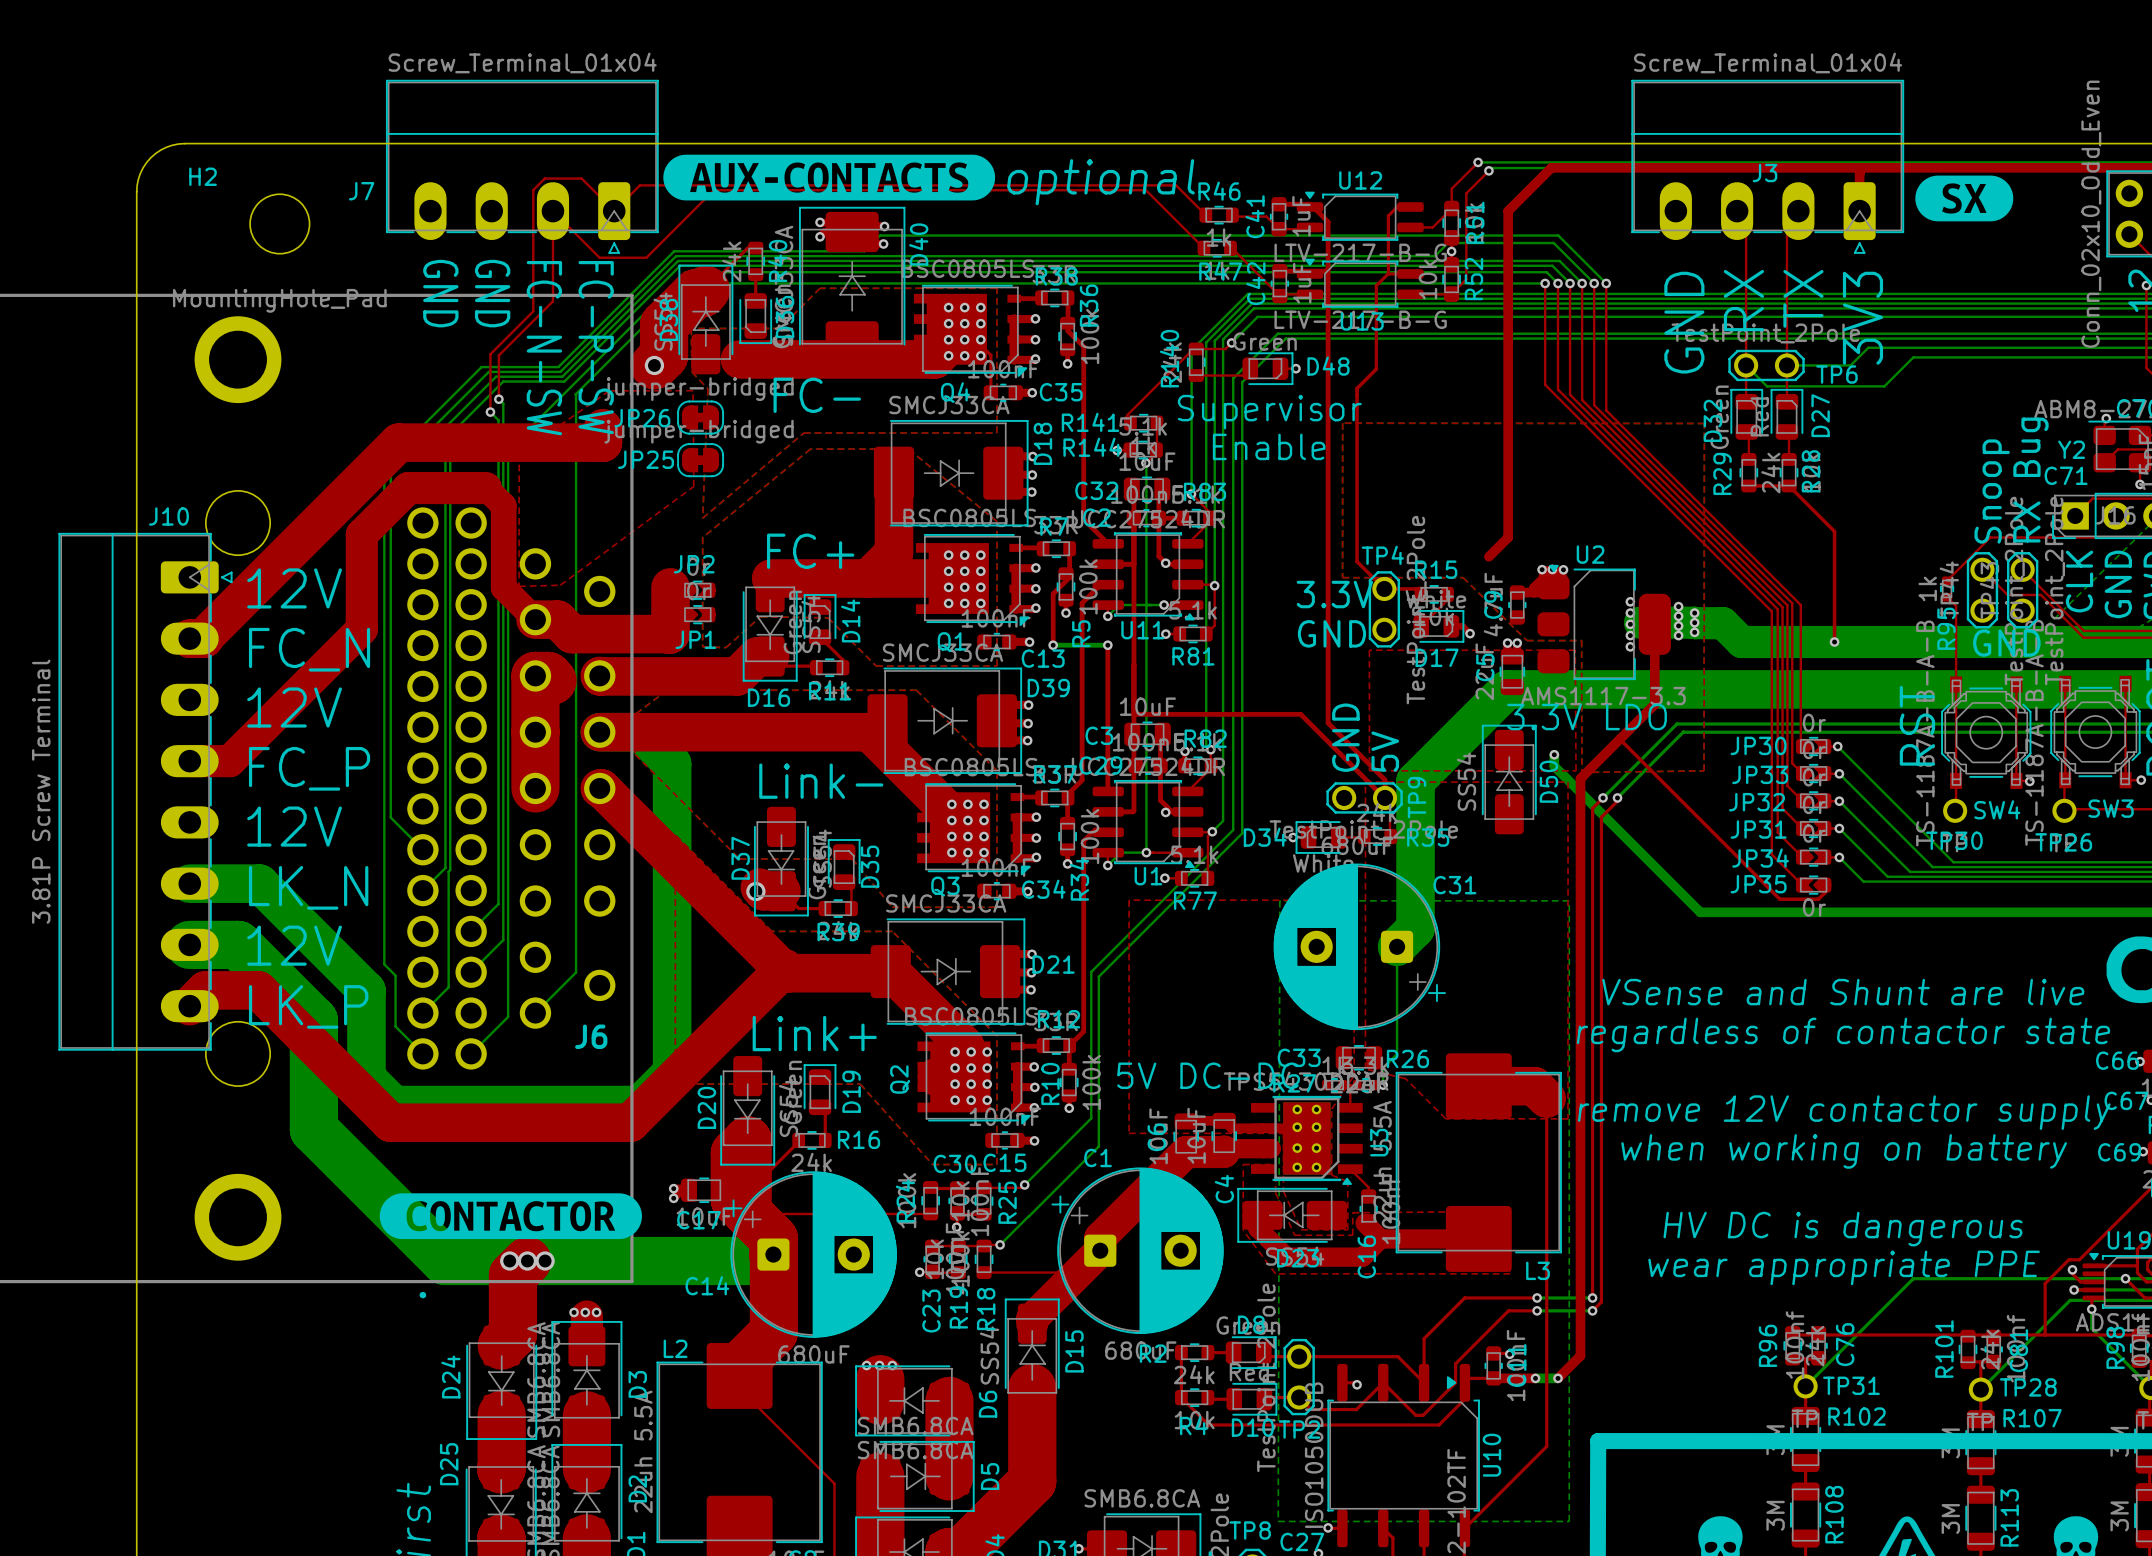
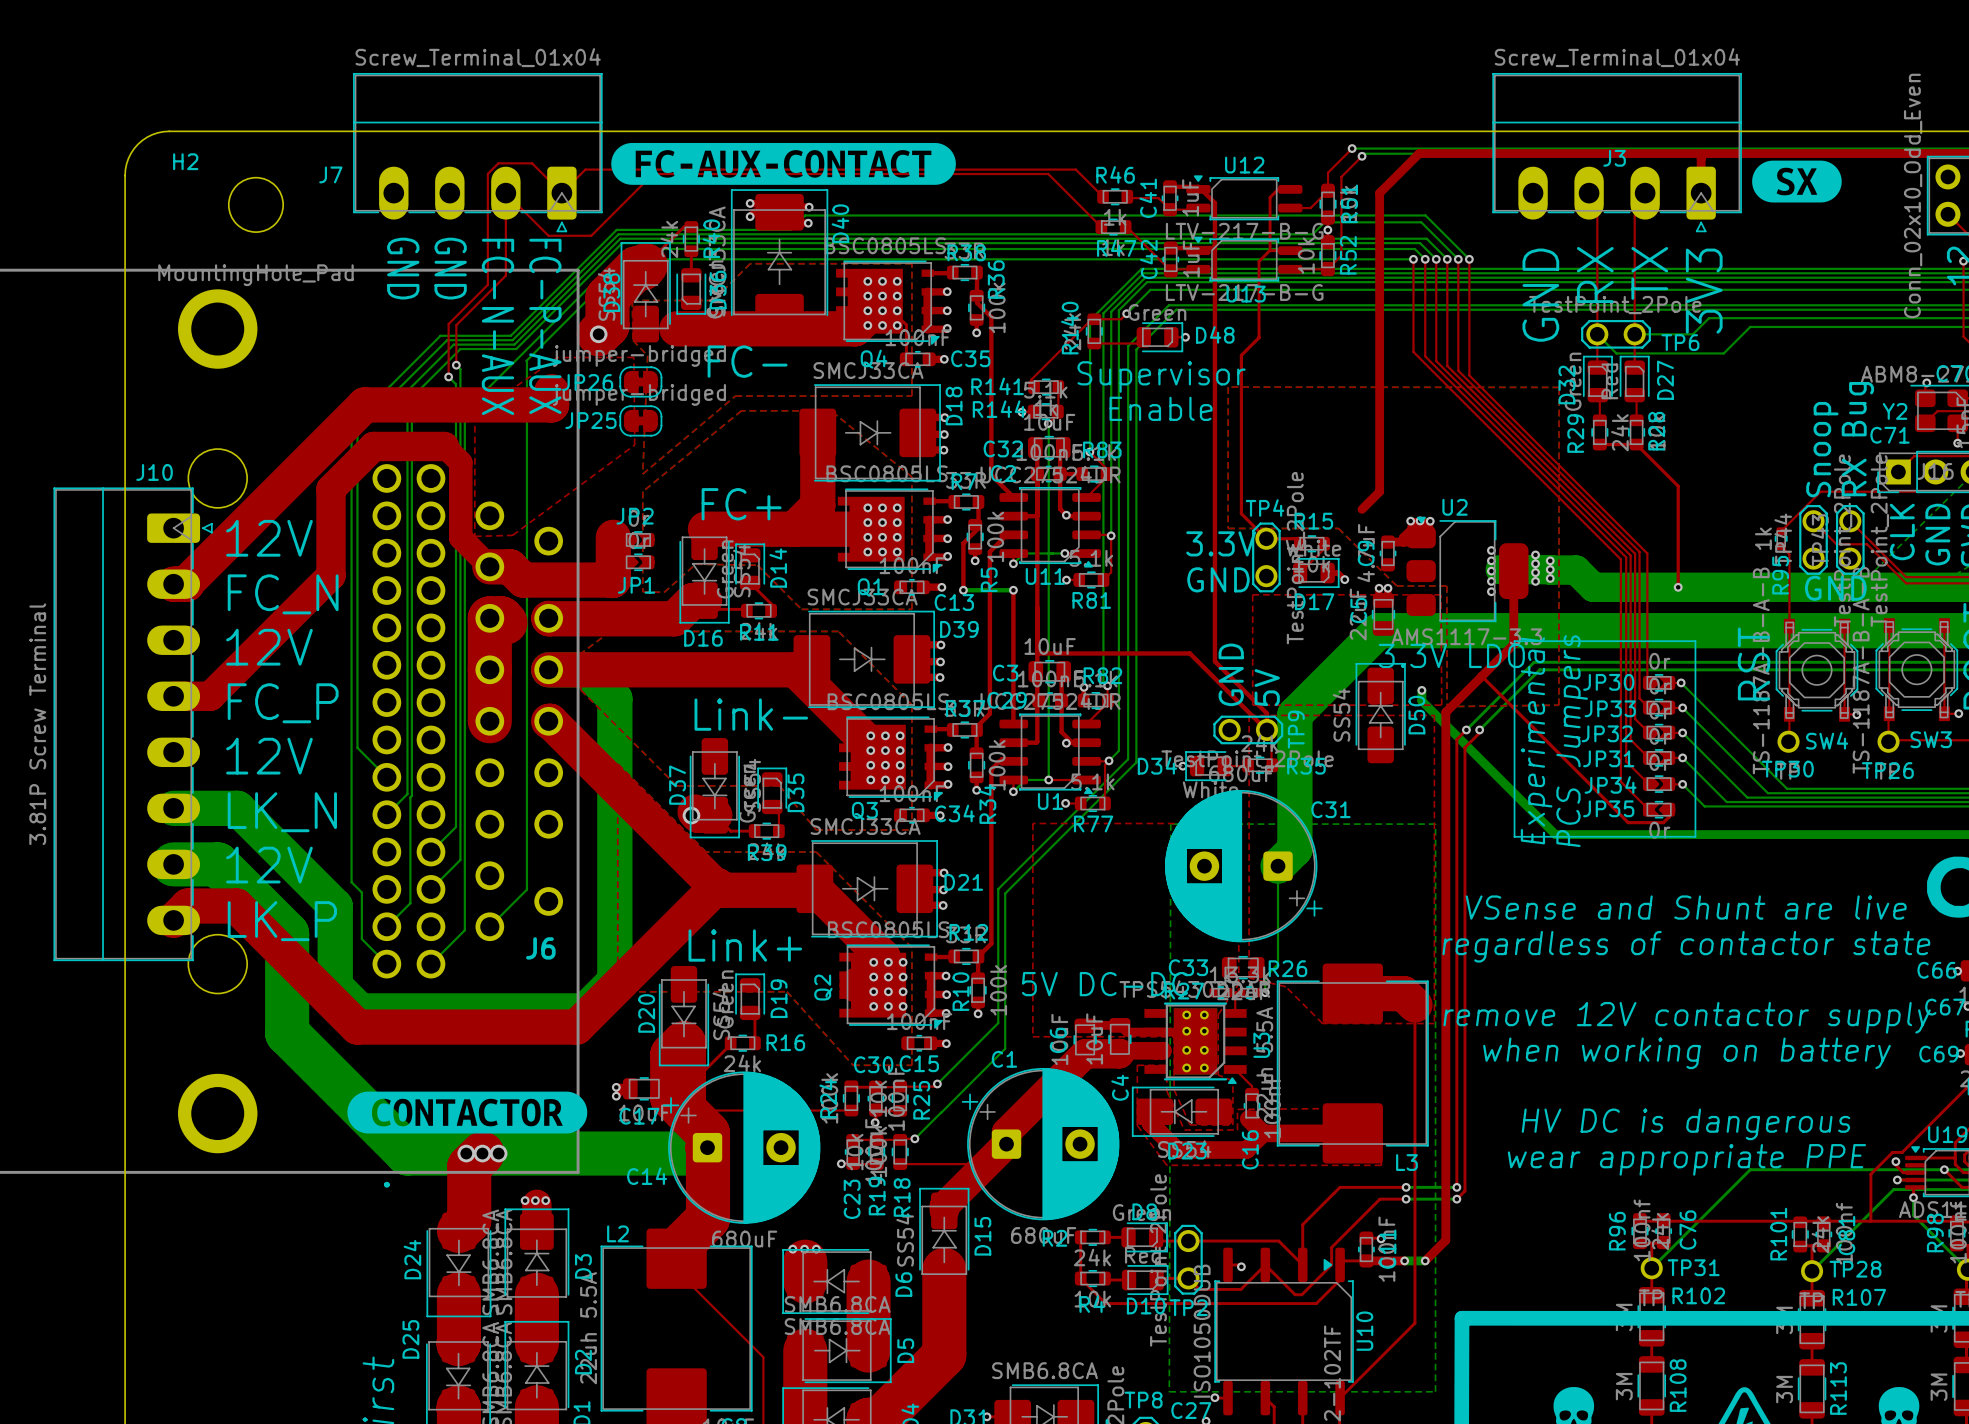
drawing: [663, 154, 996, 201] -> none
drawing: none -> [611, 142, 956, 185]
text: optional (1100, 182) -> none
text: FC-P-SW (596, 347) -> FC-P-AUX (545, 326)
text: FC-N-SW (544, 348) -> FC-N-AUX (498, 326)
line: none -> (1514, 641) (1695, 641) (1695, 836) (1514, 836) (1514, 641)
text: none -> Experimental (1536, 740)
text: none -> PCS Jumpers (1572, 741)

